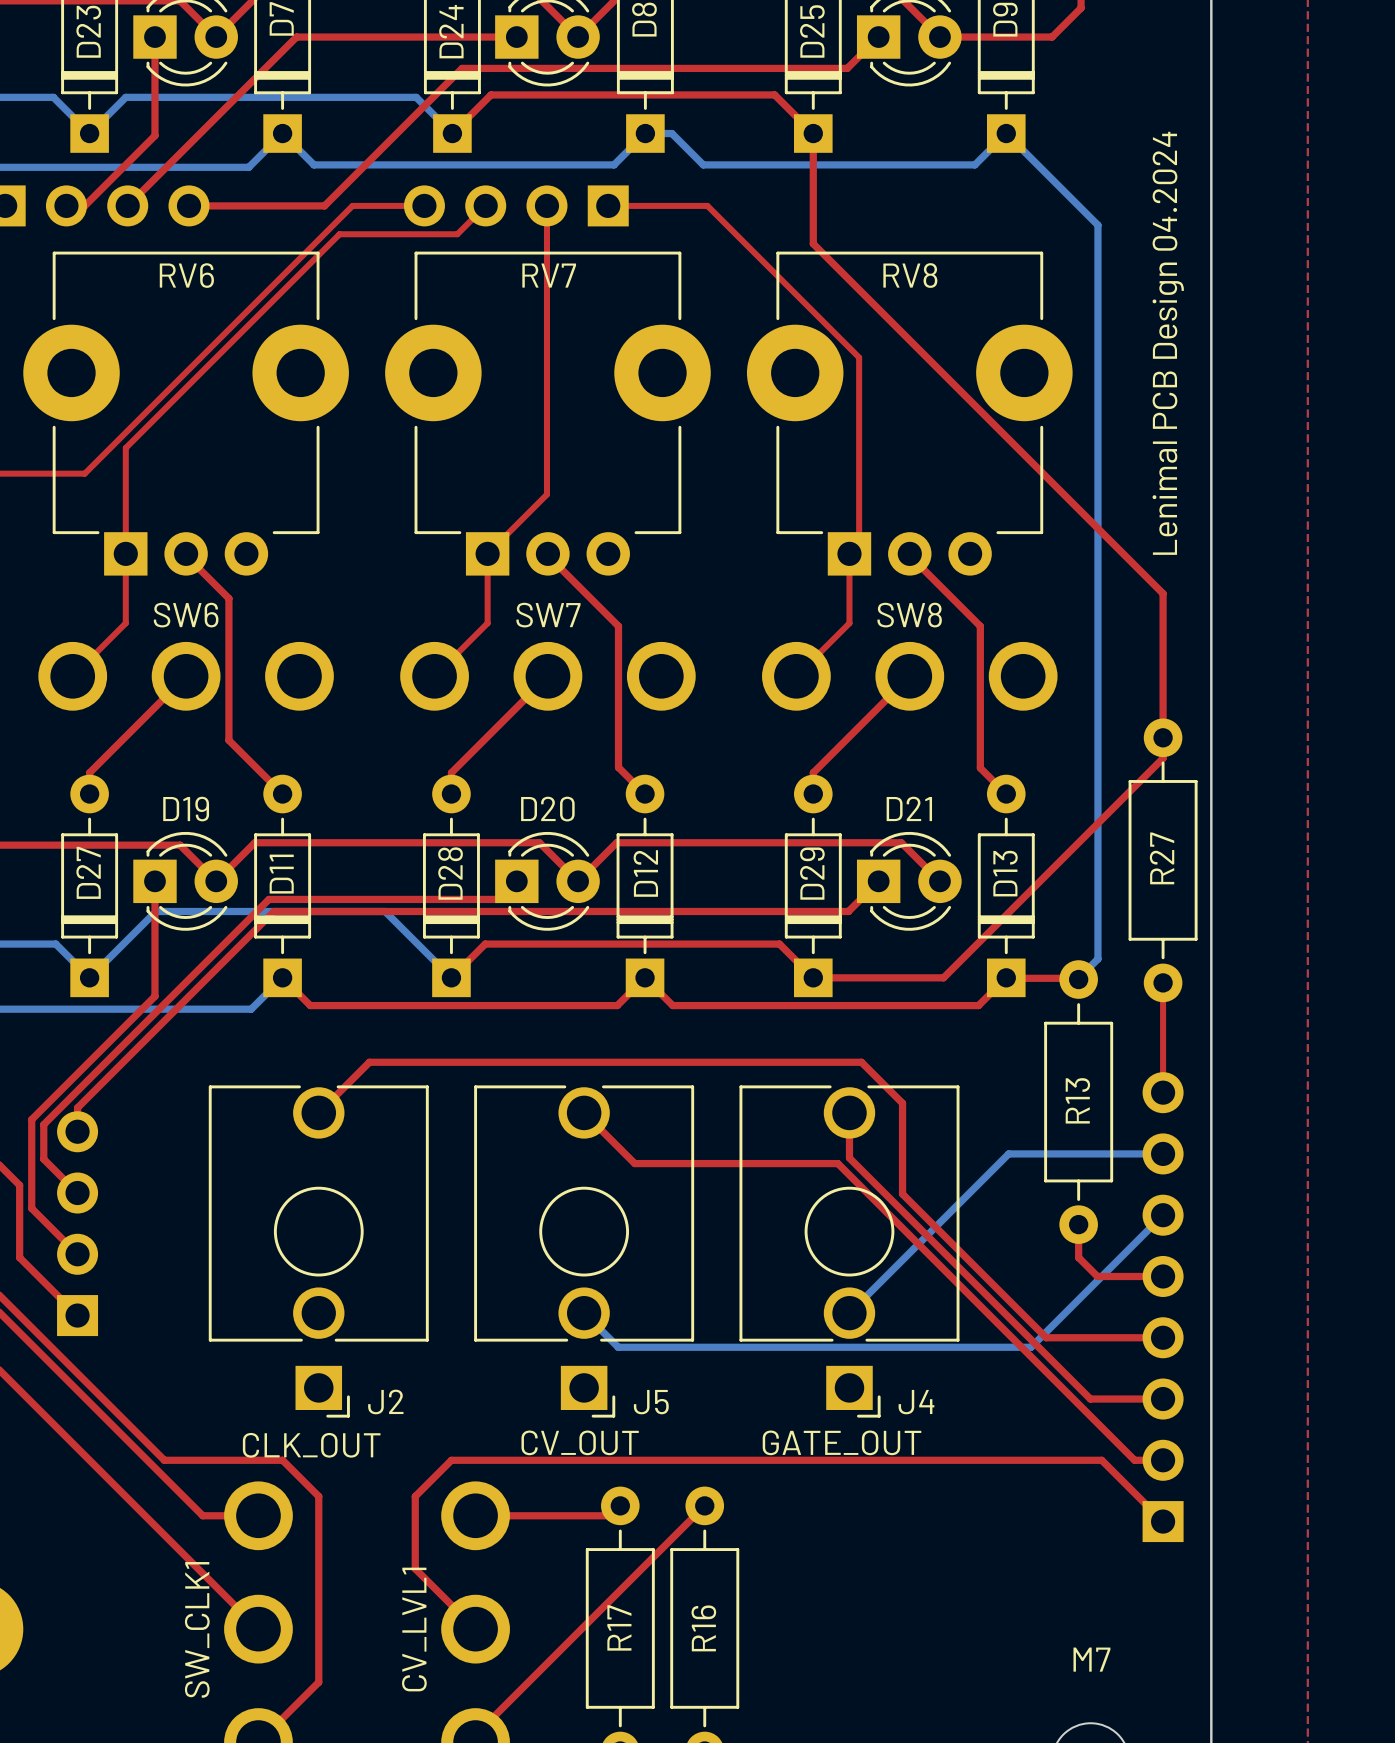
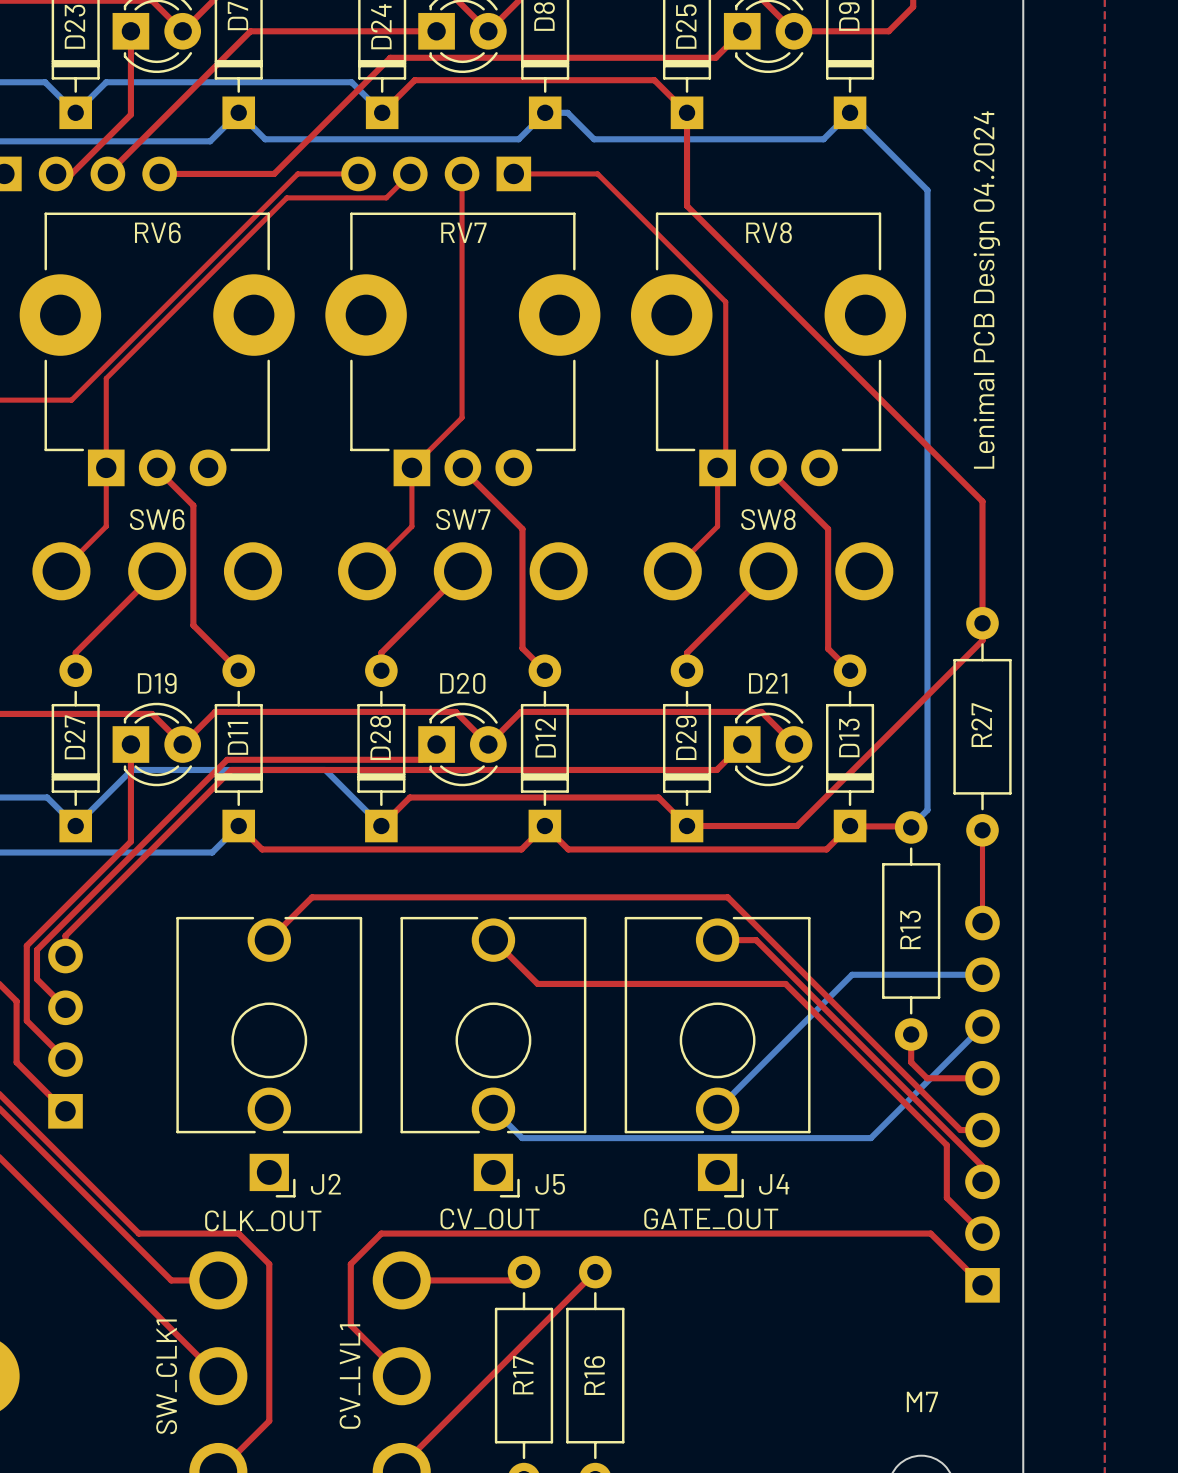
top track: (902, 1103) (902, 1194) (1046, 1337) (1137, 1337) -> (762, 931) (960, 1130)
top track: (584, 1112) (634, 1163) (837, 1163) (1134, 1460) (1163, 1460) -> (493, 939) (537, 983) (785, 983) (946, 1145) (946, 1197) (982, 1233)
top track: (849, 1112) (849, 1158) (1090, 1399) (1163, 1399) -> (717, 940) (756, 940) (982, 1166) (982, 1181)

